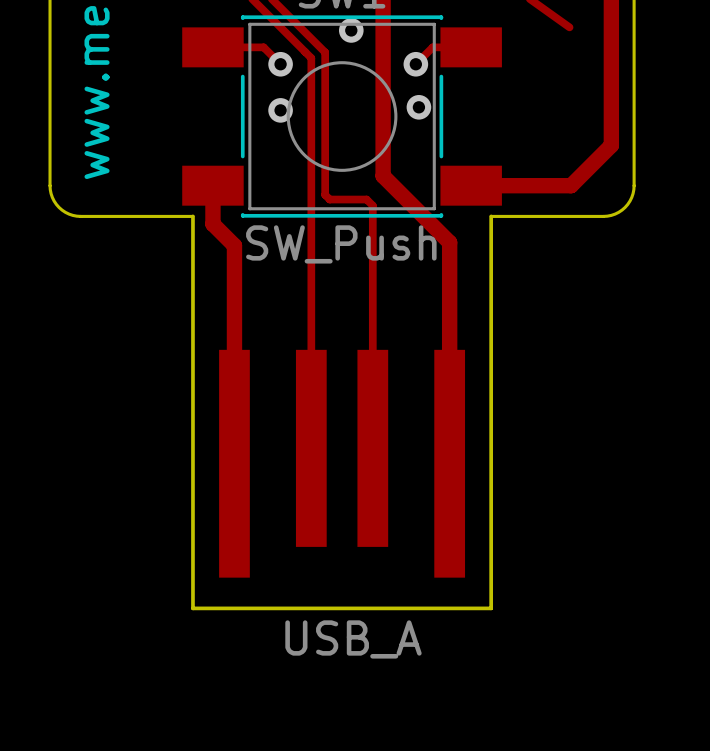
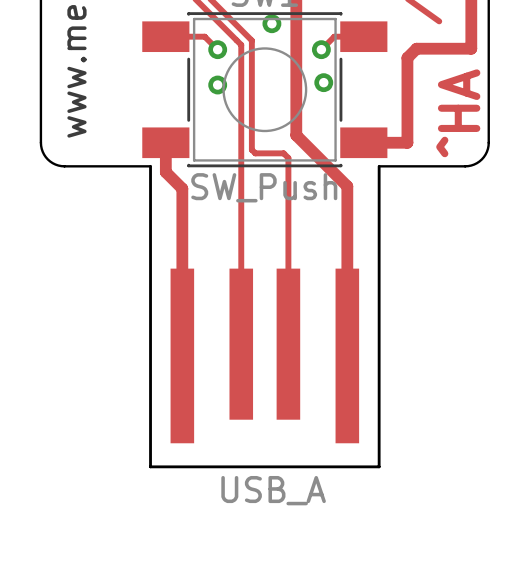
track: (611, 63) (611, 145) (571, 185) (528, 185) -> (471, 48) (416, 48) (407, 57) (407, 142)
text: none -> ^HA (458, 113)

